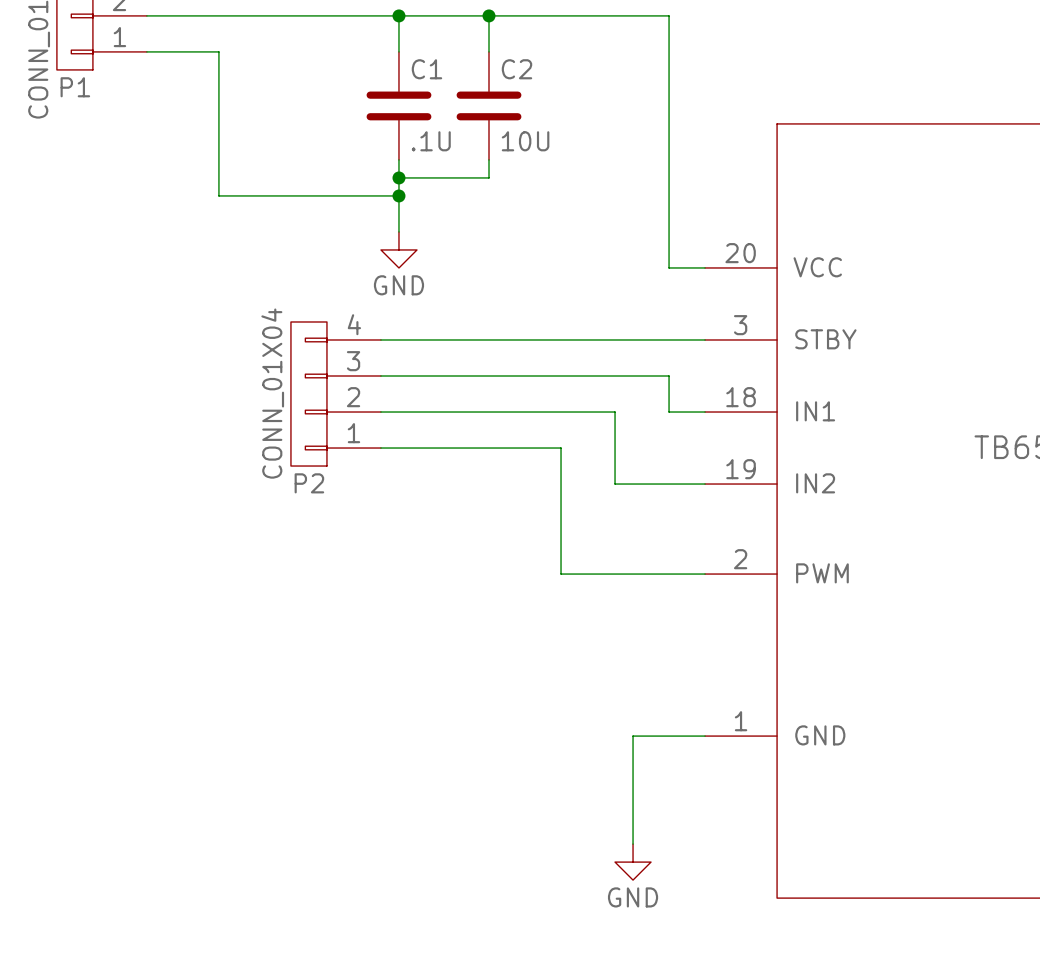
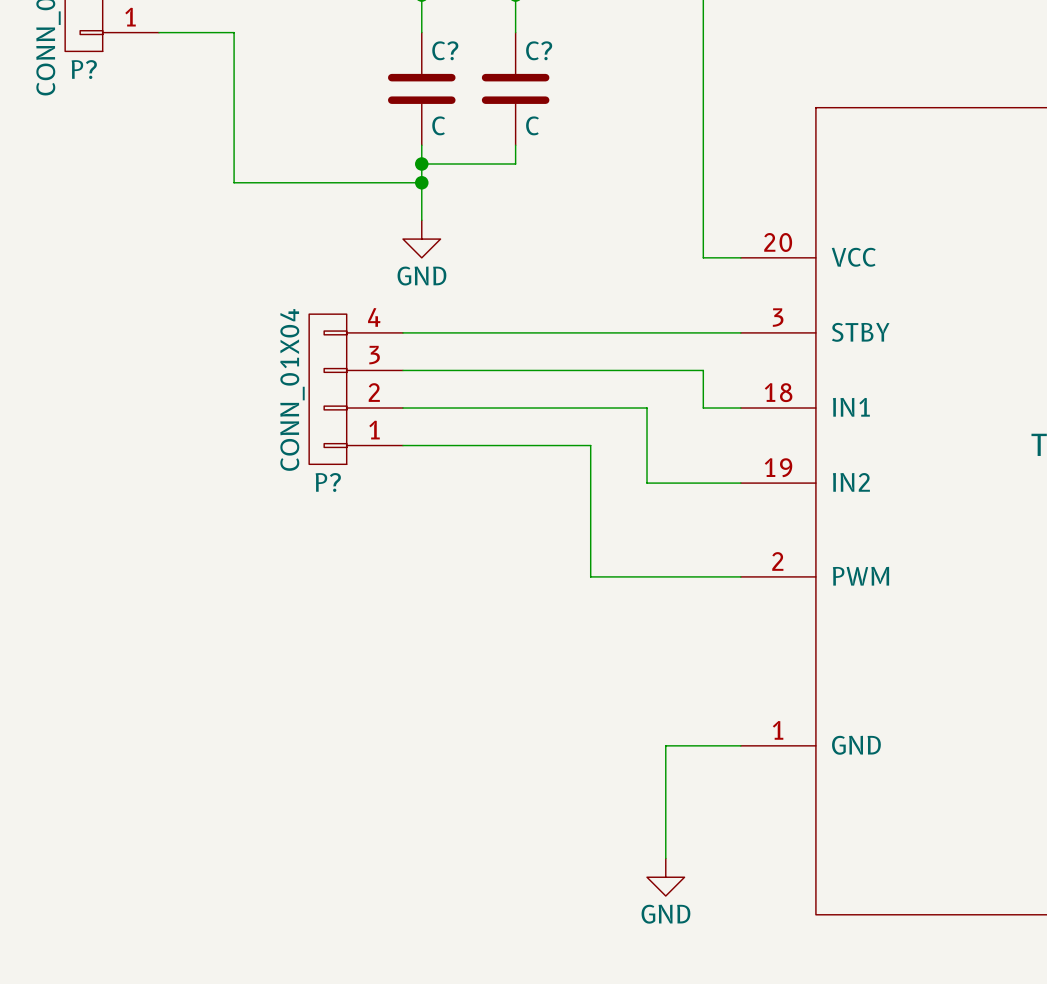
C1 name: C1 (426, 69) -> C? (445, 50)
C2 name: C2 (517, 69) -> C? (539, 50)
P1 name: P1 (75, 87) -> P? (84, 69)
C1 value: .1U (431, 141) -> C (438, 125)
C2 value: 10U (525, 141) -> C (532, 125)
P2 name: P2 (309, 483) -> P? (328, 482)

